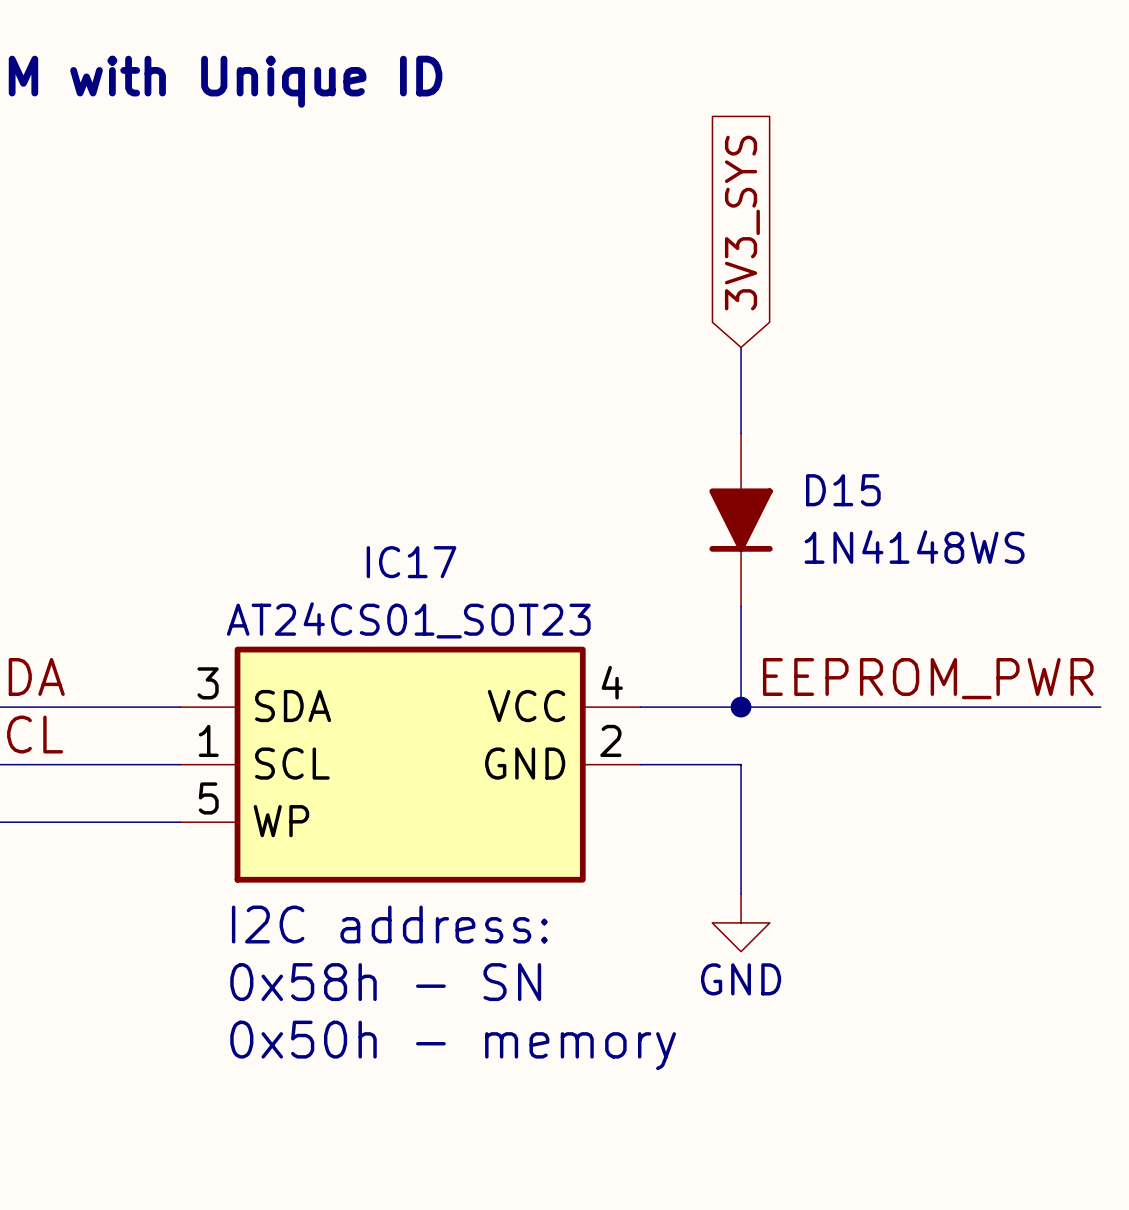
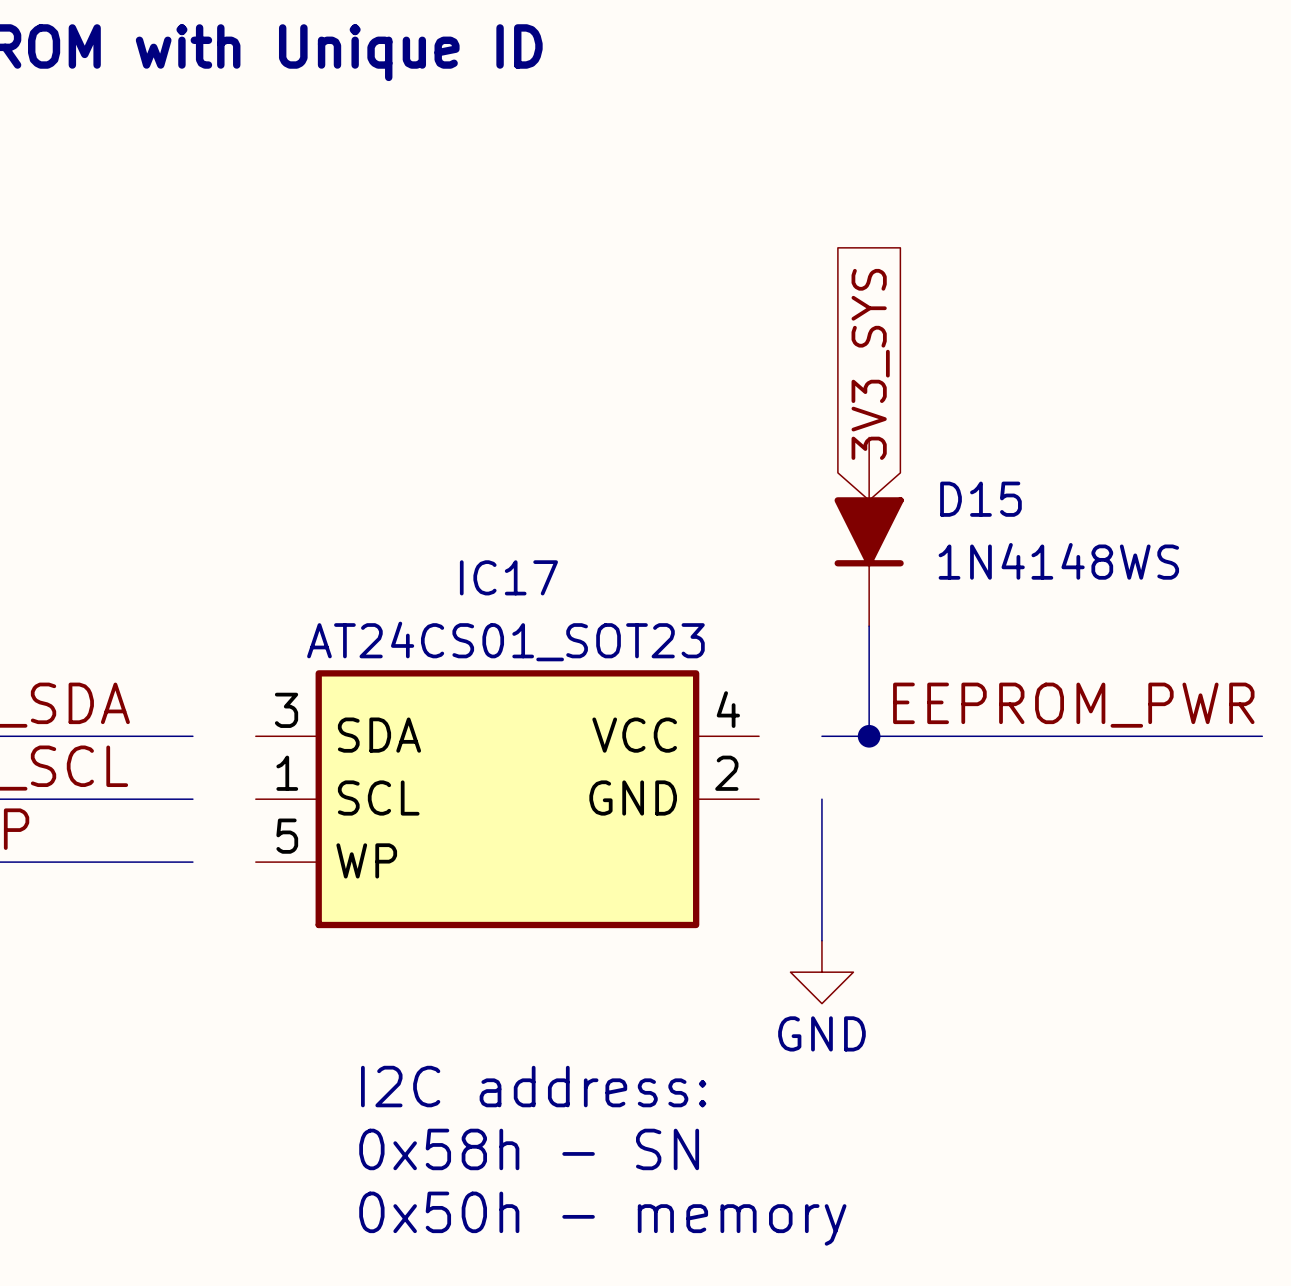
global label position: 3V3_SYS (742, 223) -> 3V3_SYS (870, 364)
wire: (741, 347) (741, 433) -> none
wire: (122, 707) (179, 707) -> none
wire: (640, 707) (697, 707) -> none
wire: (122, 764) (179, 764) -> none
wire: (640, 764) (741, 764) (741, 894) -> none
wire: none -> (821, 799) (821, 940)
wire: (122, 822) (179, 822) -> none
power symbol position: GND (741, 922) -> GND (821, 972)
text position: I2C address: (389, 924) -> I2C address: (533, 1086)
text position: 0x58h - SN (385, 982) -> 0x58h - SN (529, 1149)
text position: 0x50h - memory (453, 1045) -> 0x50h - memory (602, 1218)

